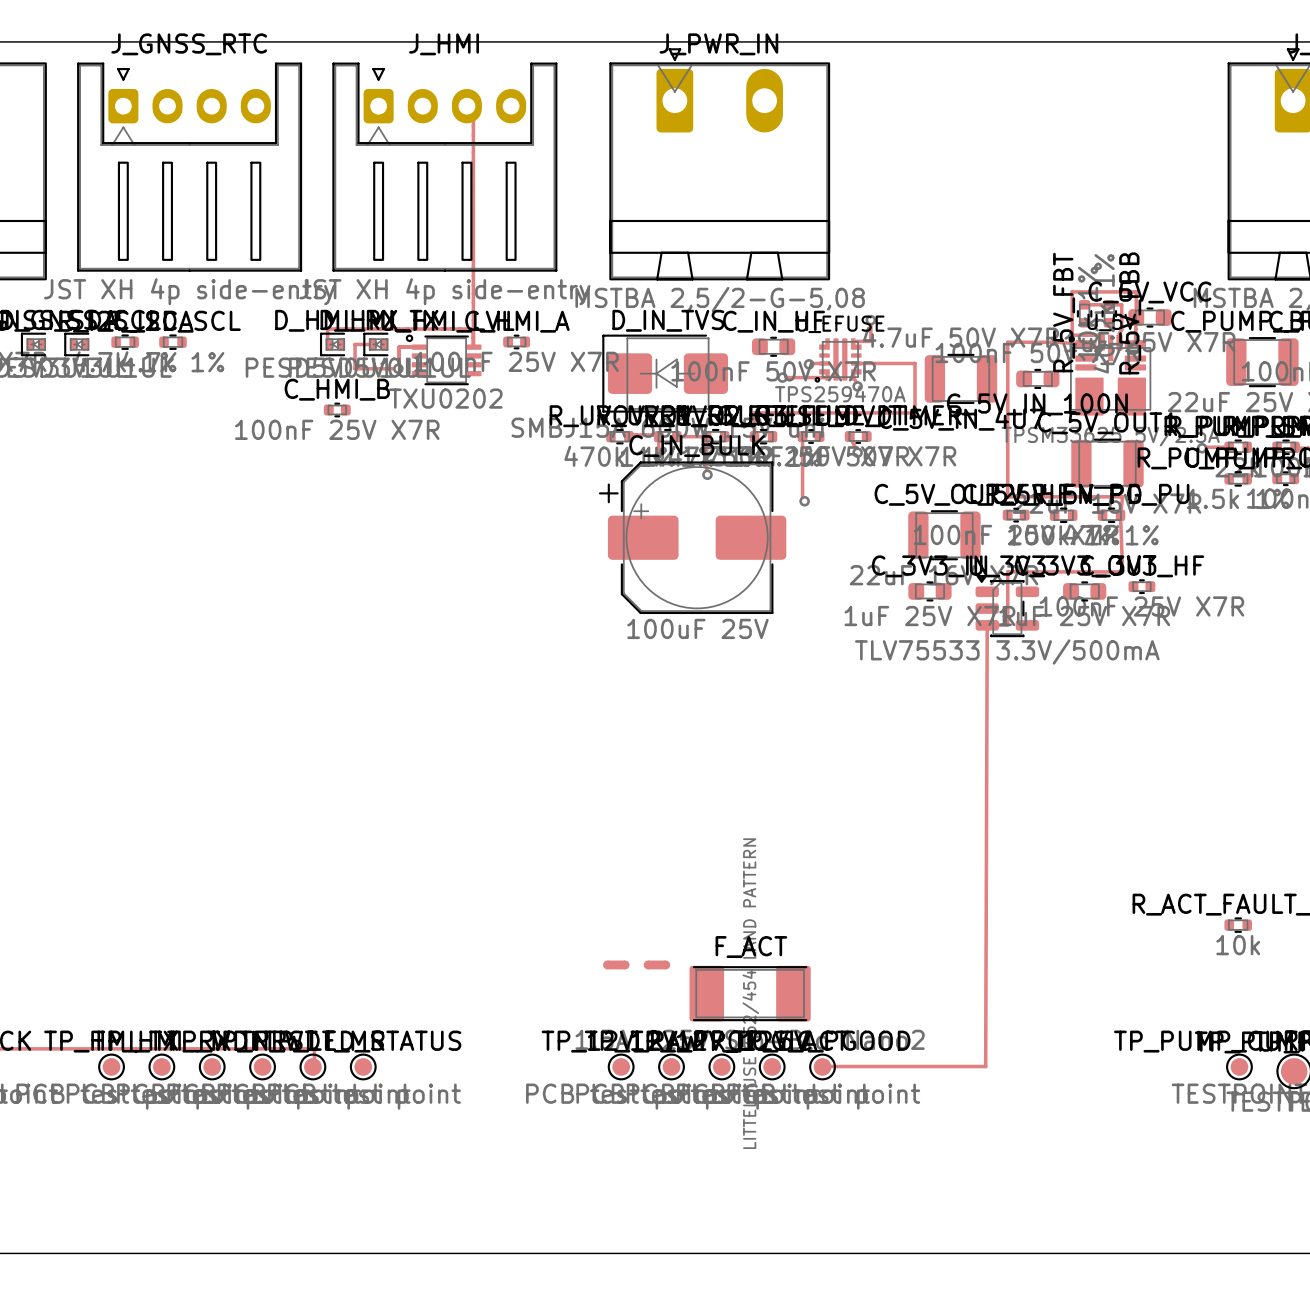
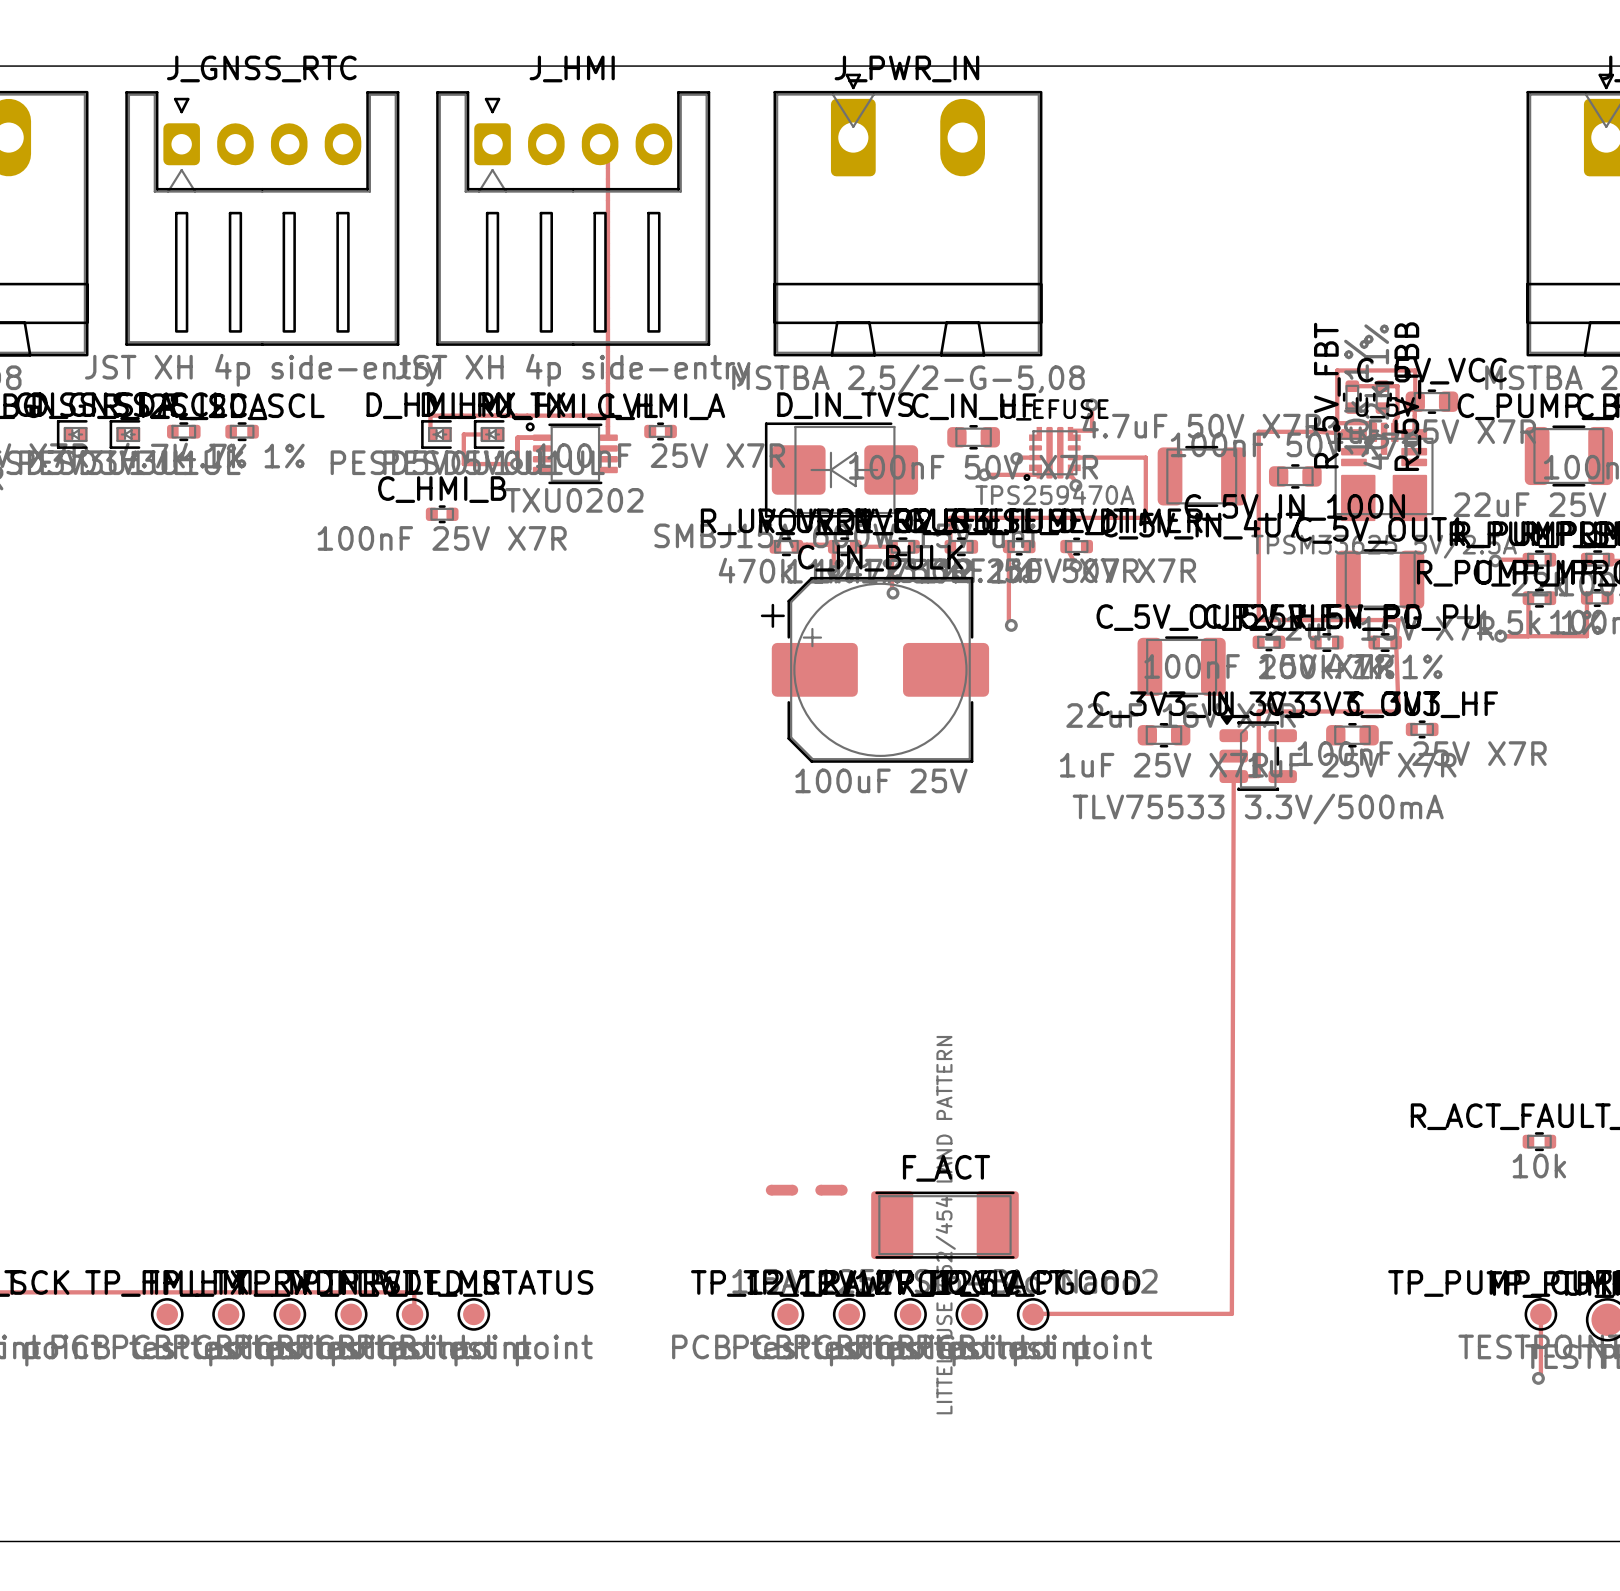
track: none -> (1528, 598) (1528, 636)
track: none -> (1586, 597) (1586, 636) (1500, 636)
via: none -> (1500, 636)
track: none -> (1540, 1314) (1540, 1377)
via: none -> (1538, 1378)

